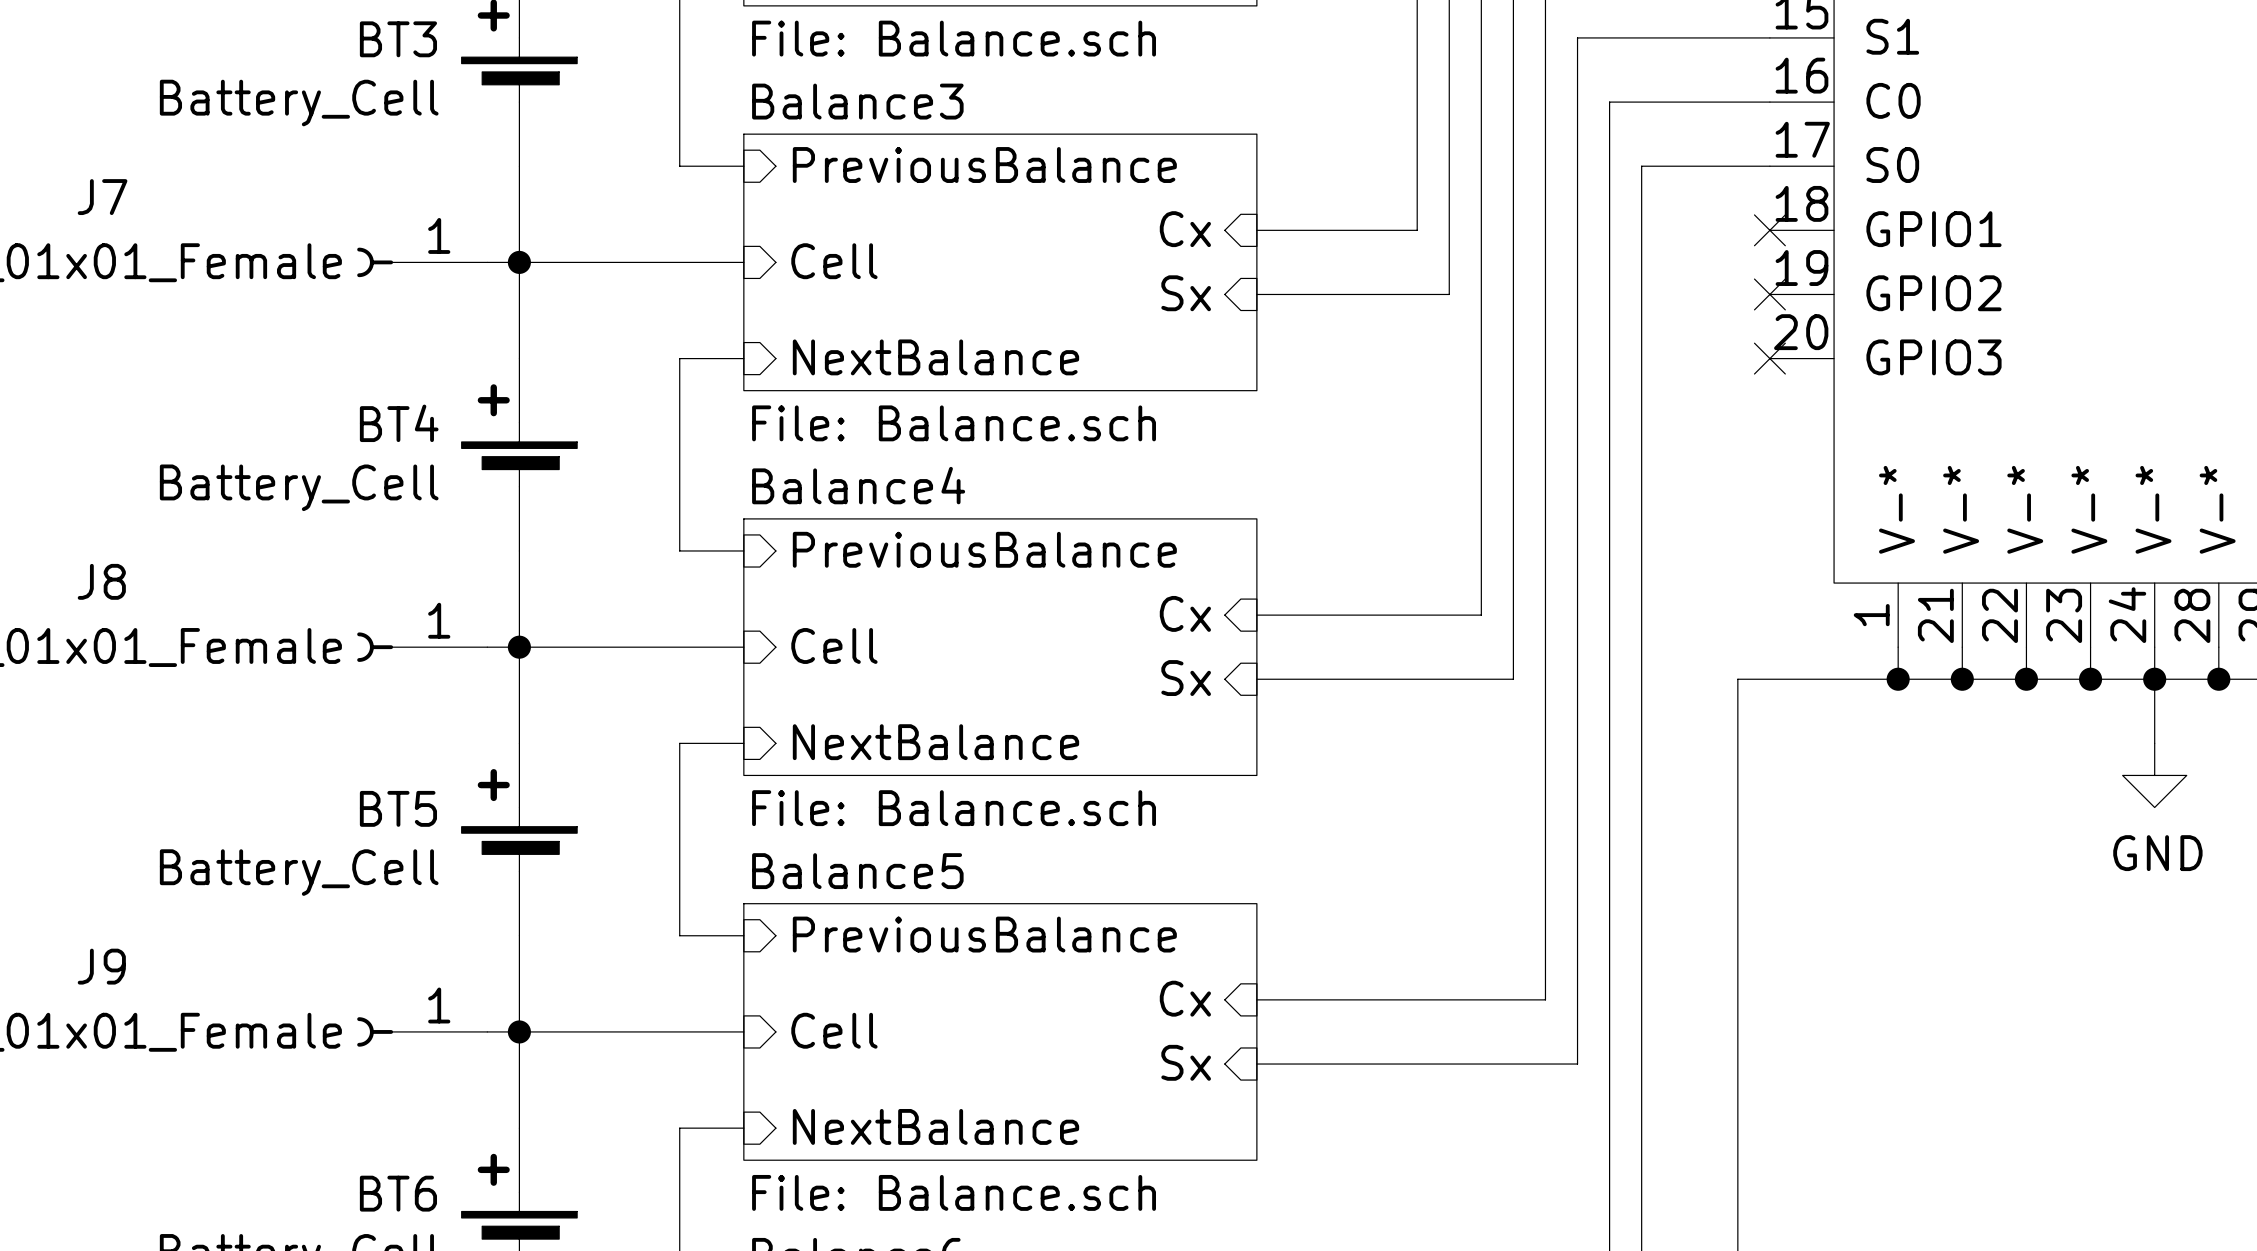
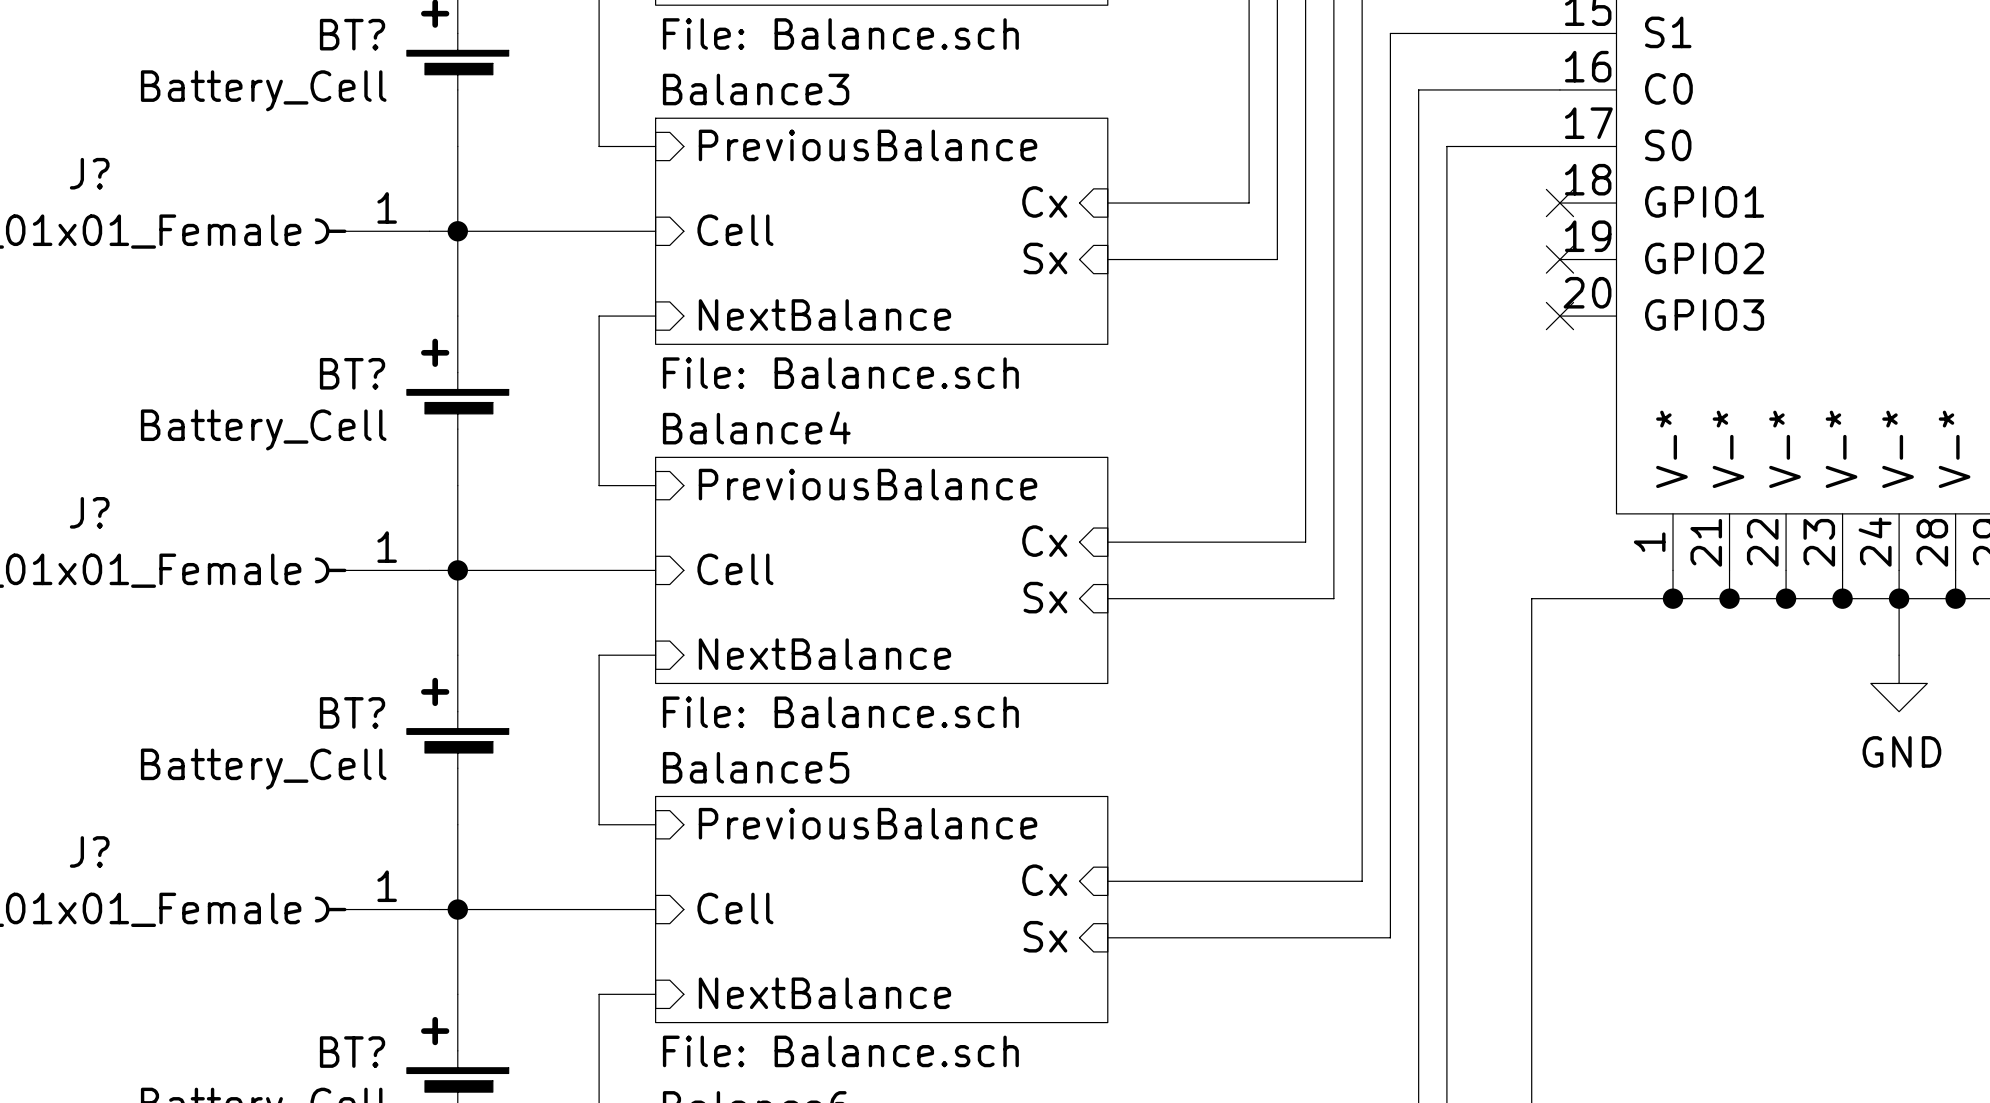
BT3 name: BT3 (398, 39) -> BT? (352, 34)
J7 name: J7 (102, 197) -> J? (89, 173)
BT4 name: BT4 (399, 423) -> BT? (352, 373)
J8 name: J8 (101, 581) -> J? (89, 512)
BT5 name: BT5 (398, 808) -> BT? (352, 712)
J9 name: J9 (101, 966) -> J? (89, 851)
BT6 name: BT6 (398, 1193) -> BT? (352, 1052)

